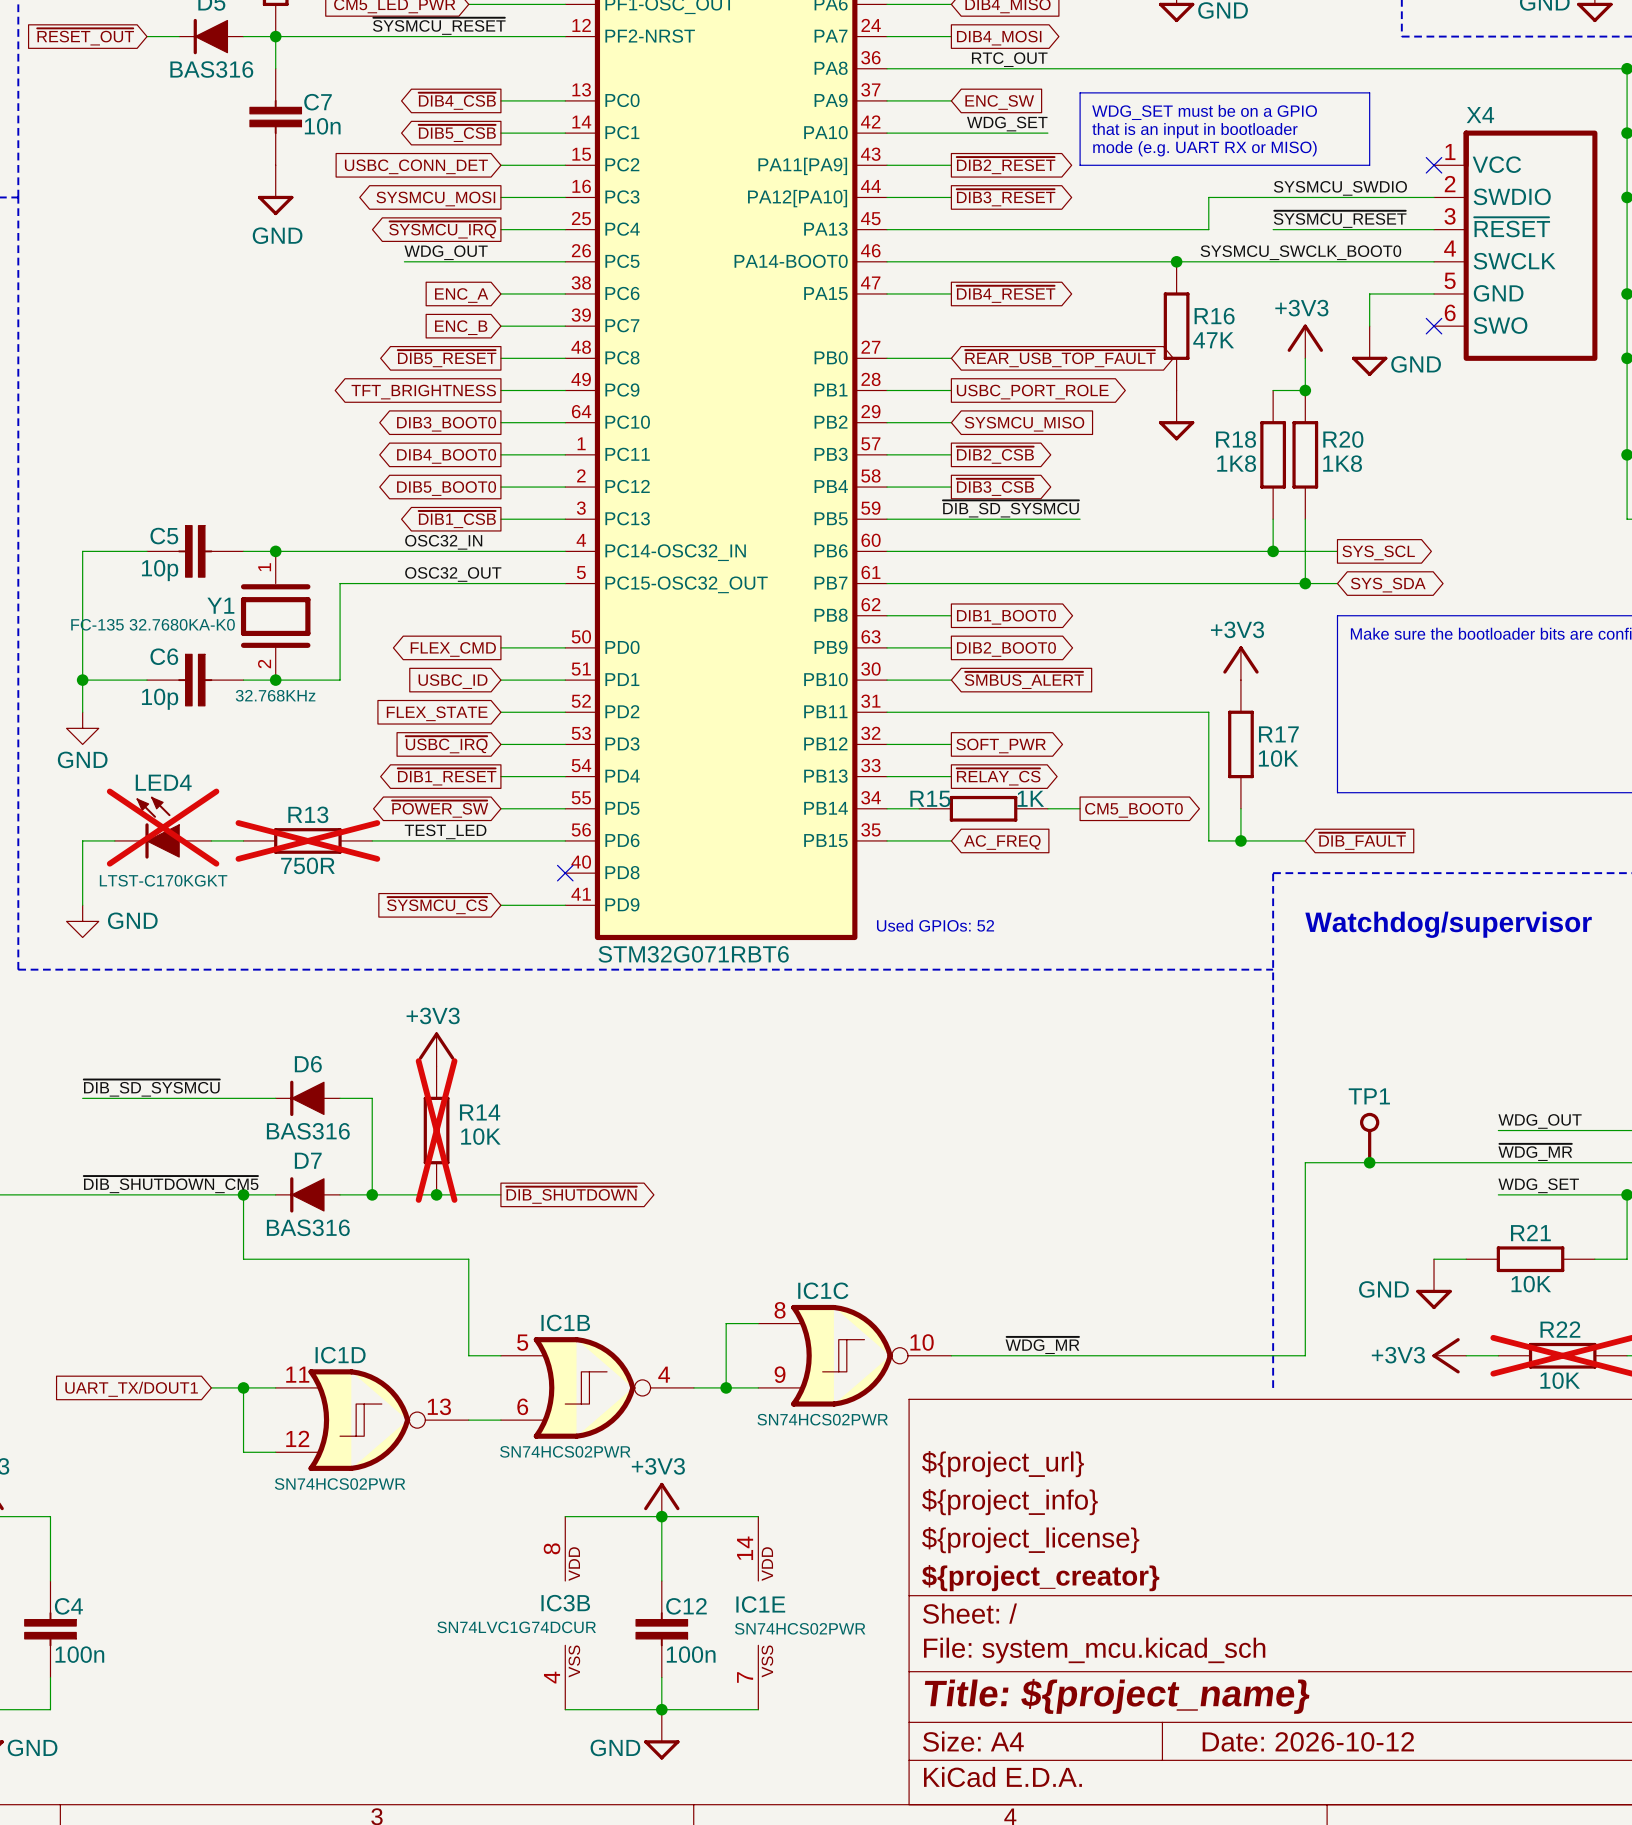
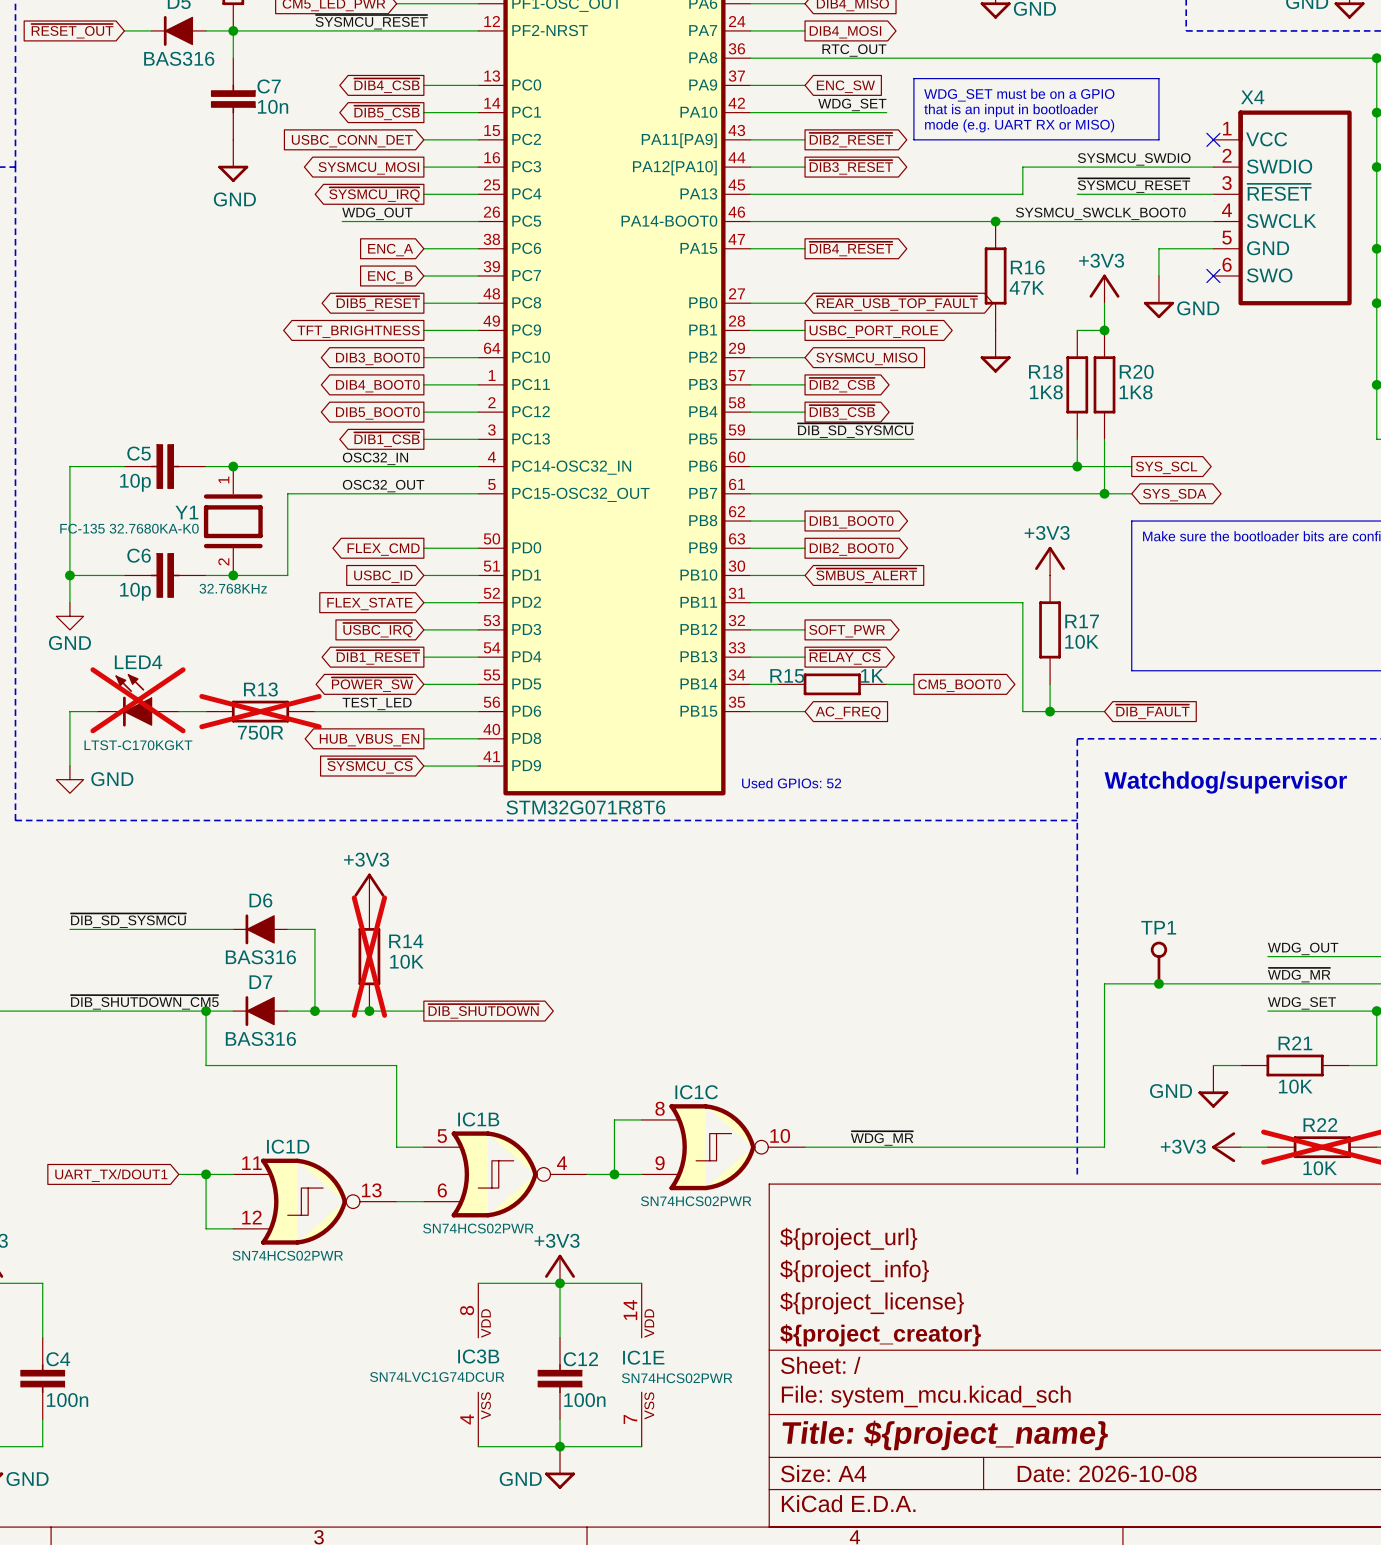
wire: none -> (423, 738) (478, 738)
no-connect mark: (565, 873) -> none
global label: none -> HUB_VBUS_EN (369, 740)
part value: STM32G071RBT6 (693, 954) -> STM32G071R8T6 (585, 807)
title block: Date: 2026-10-12 (1308, 1741) -> Date: 2026-10-08 (1107, 1473)

